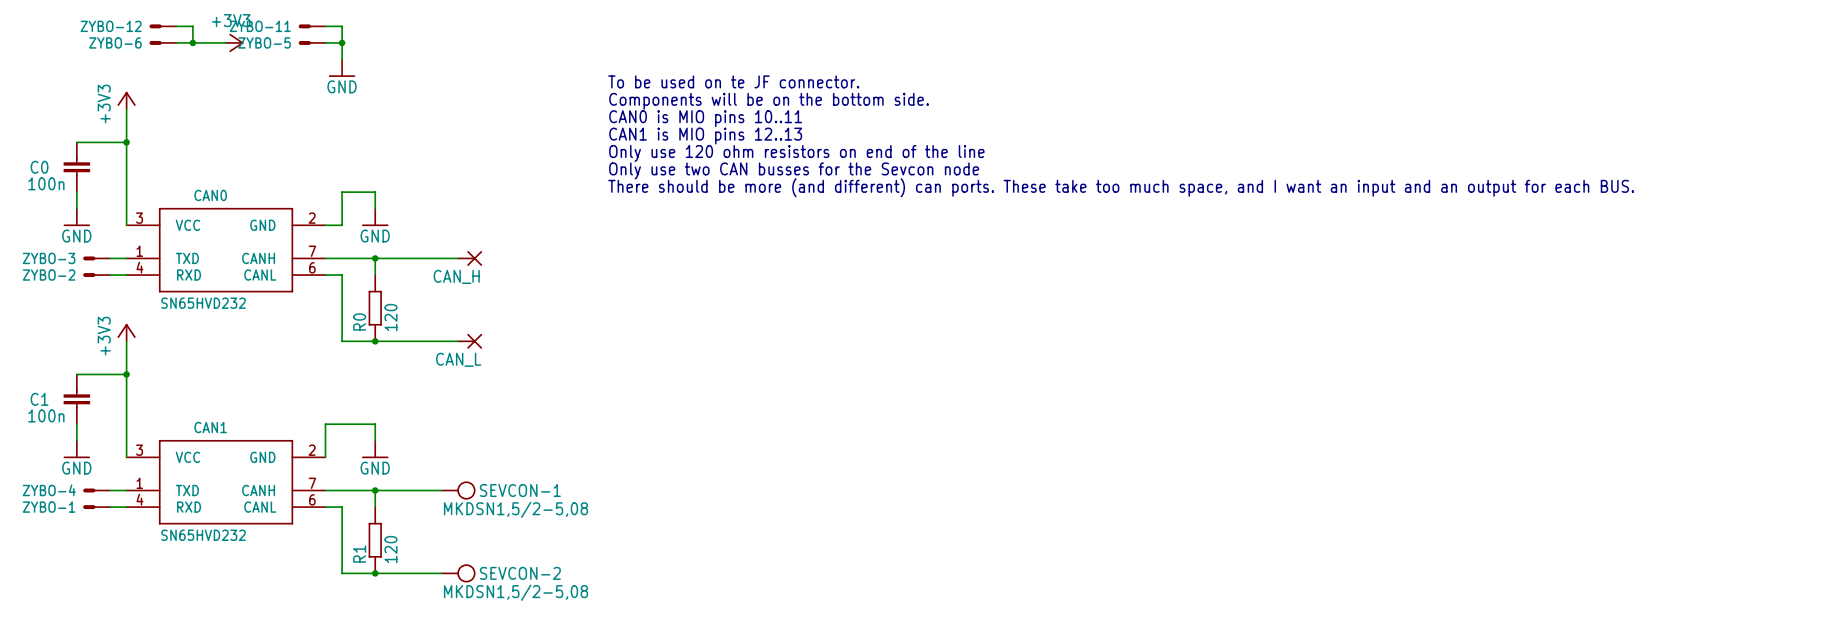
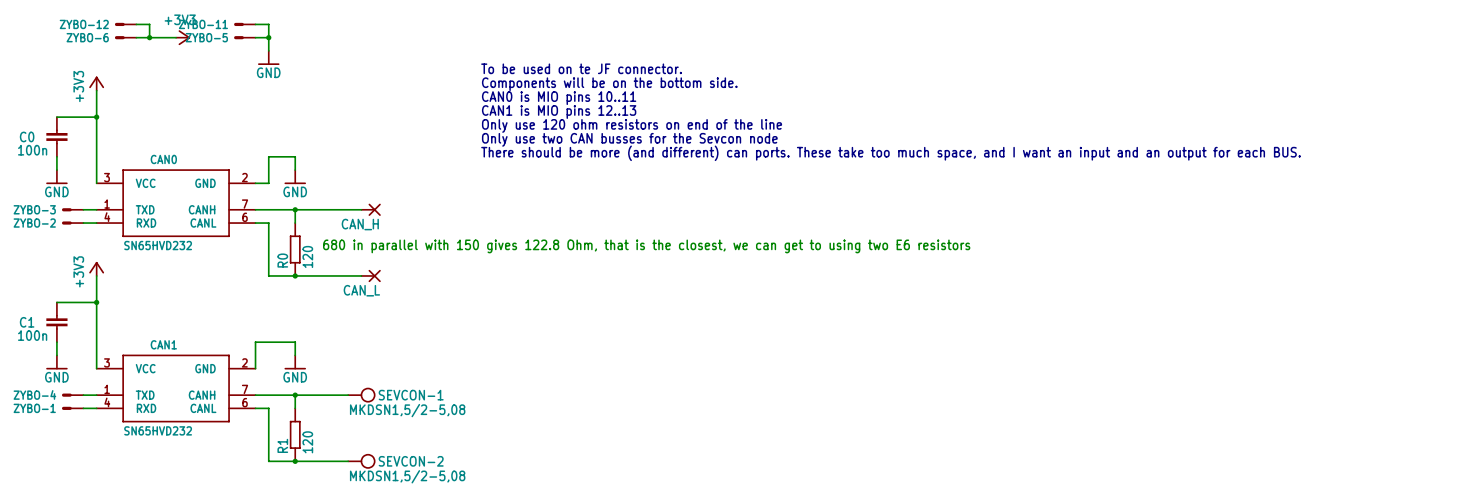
text: none -> 680 in parallel with 150 gives 122.8 Ohm, that is the closest, we can get to using two E6 resistors (646, 246)

